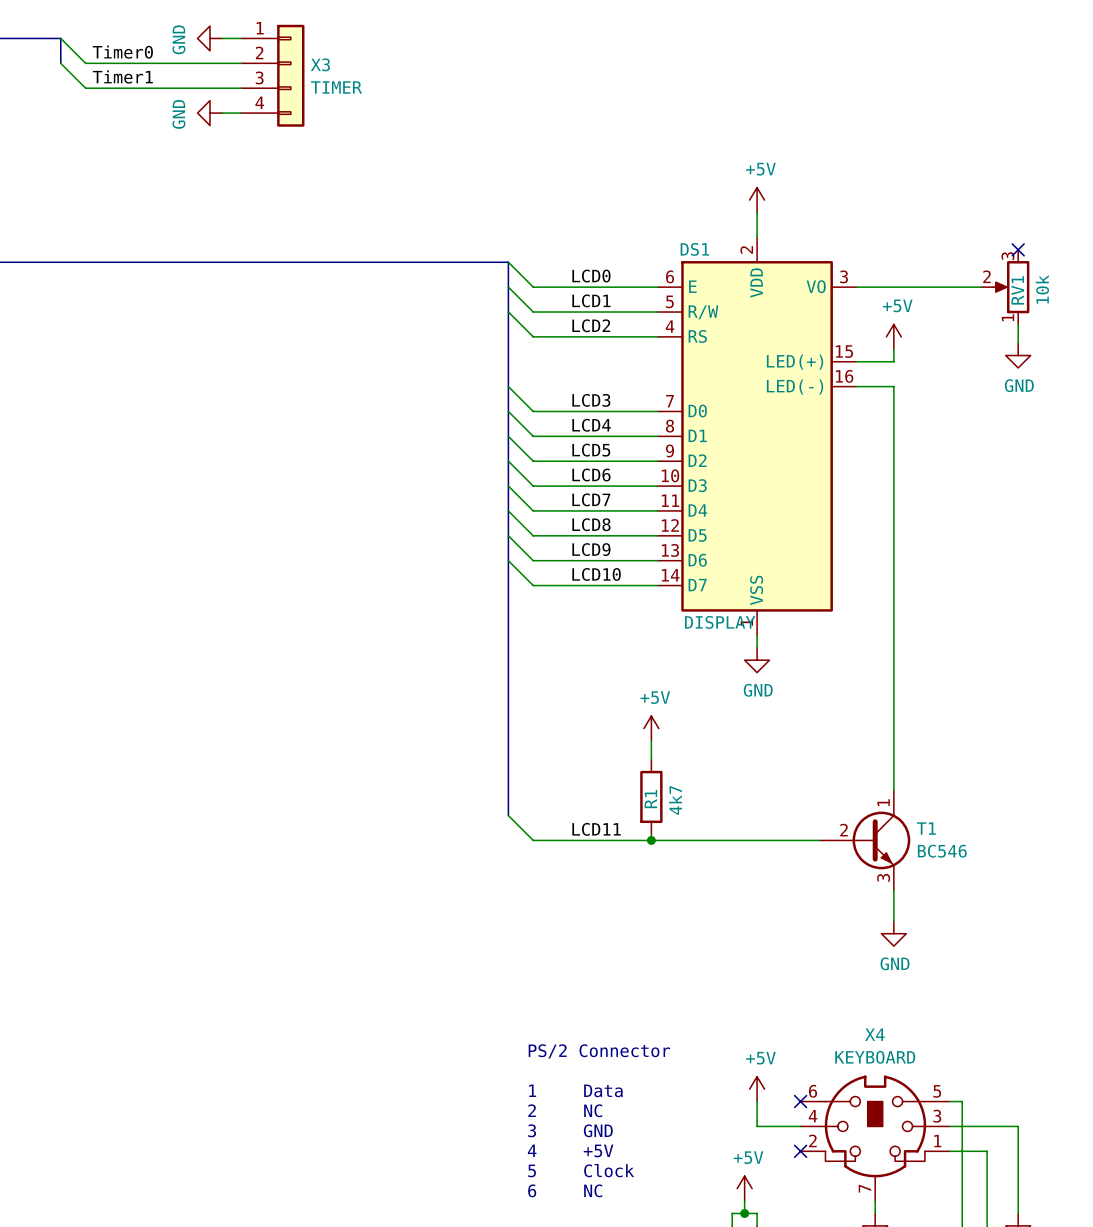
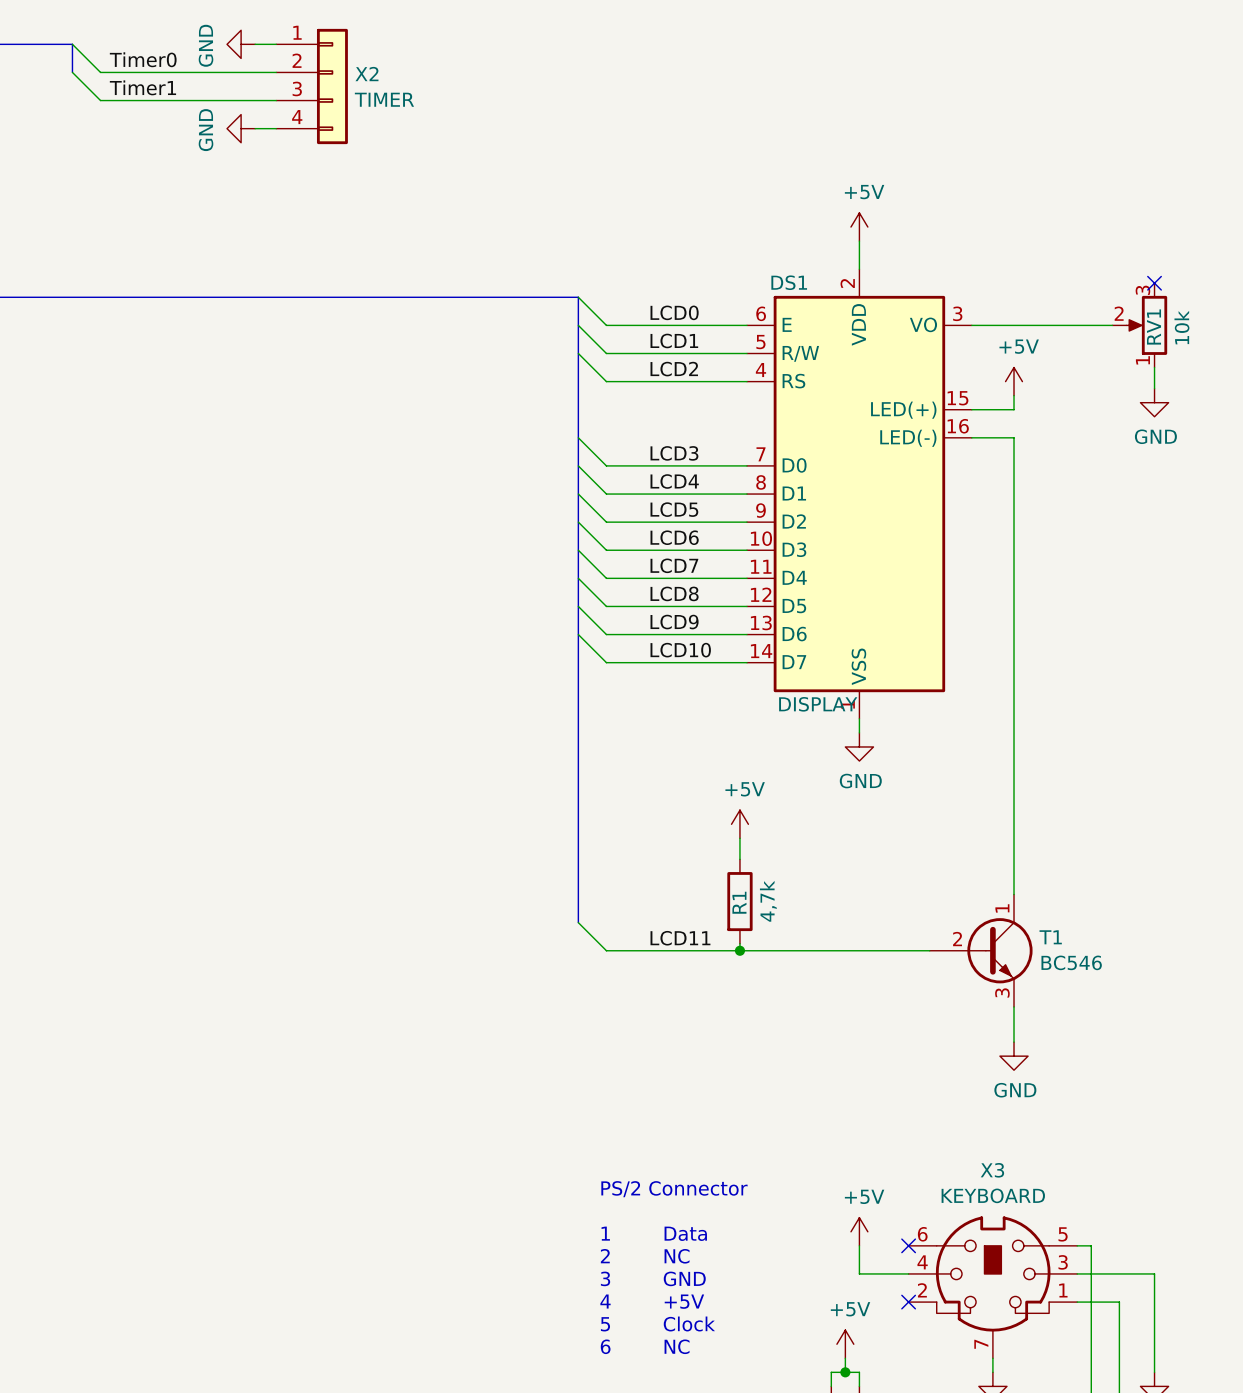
X3 name: X3 (320, 64) -> X2 (366, 74)
R1 value: 4k7 (675, 800) -> 4,7k (768, 901)
X4 name: X4 (874, 1034) -> X3 (992, 1170)

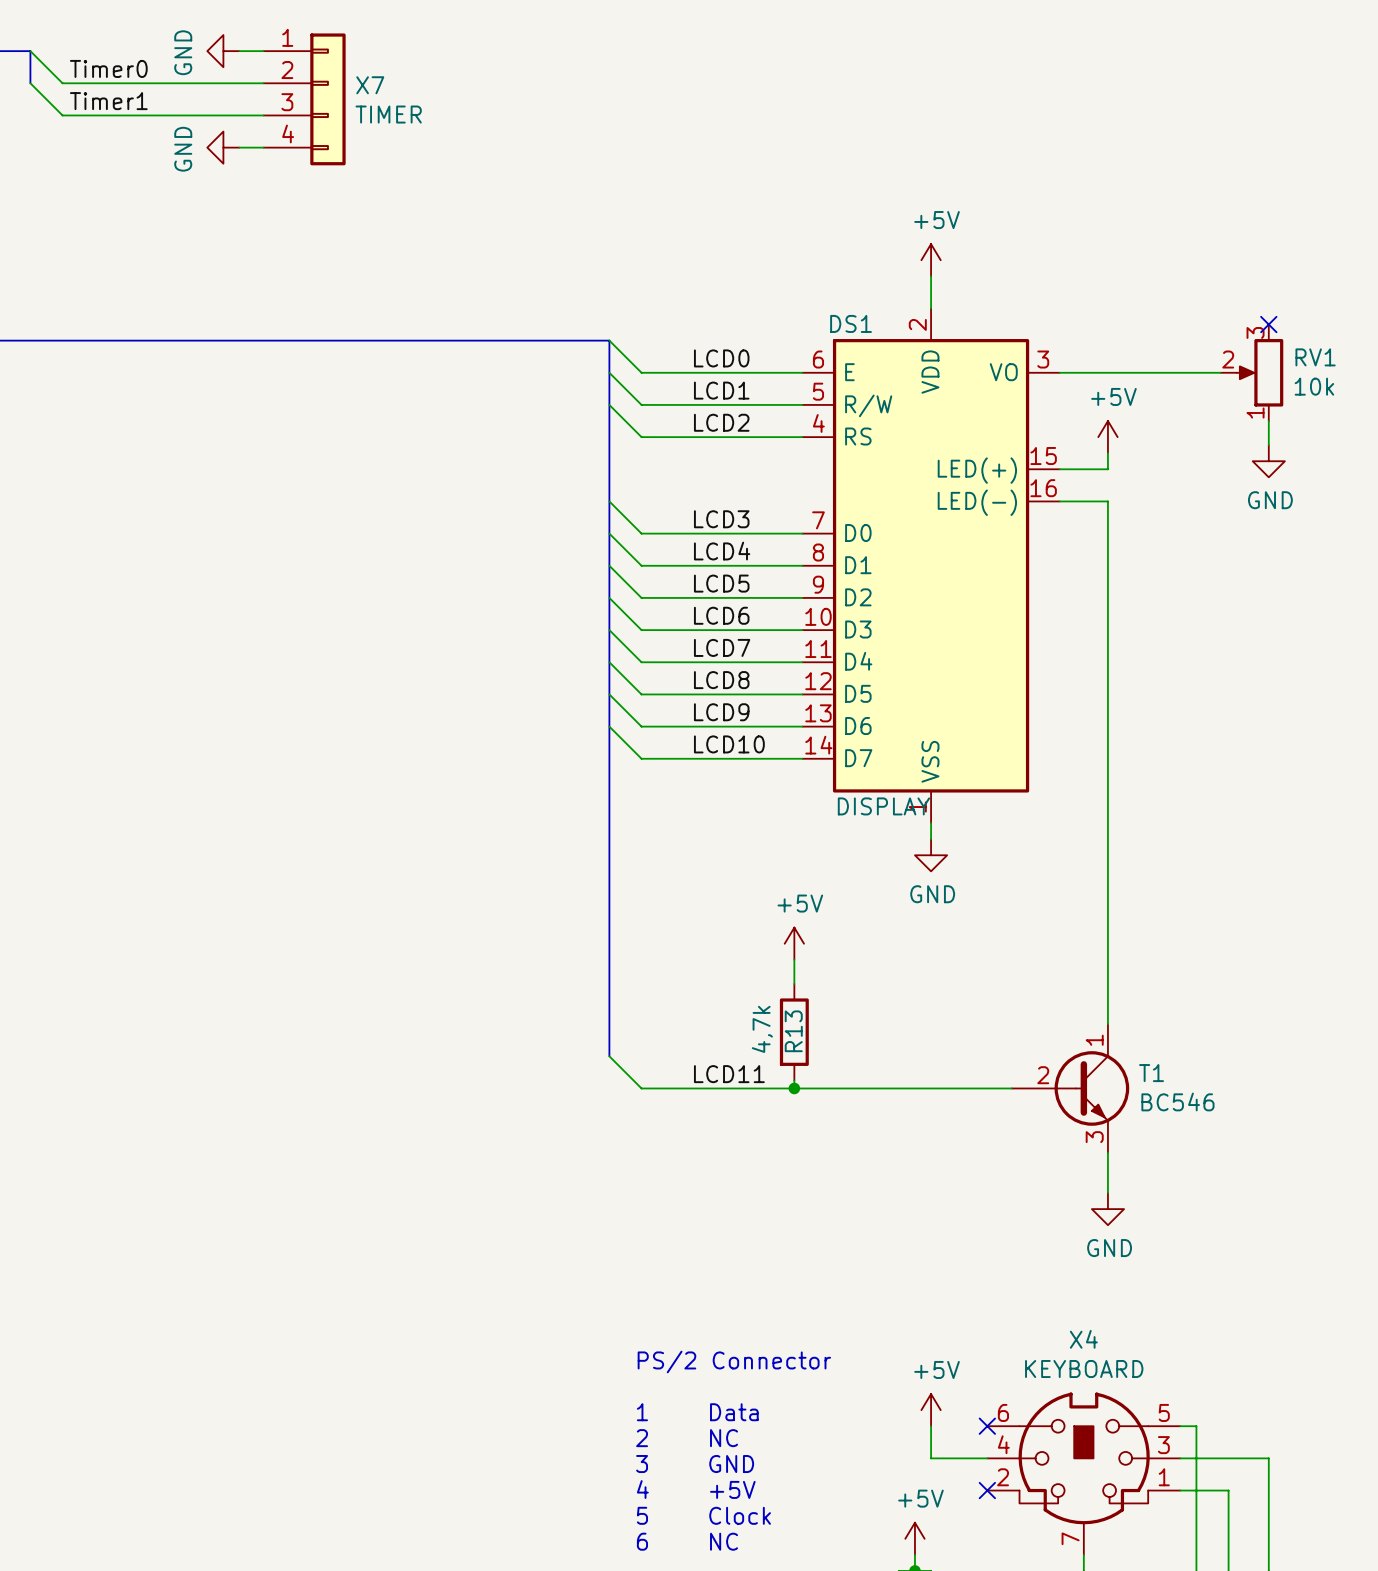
X2 name: X2 (366, 74) -> X7 (370, 85)
RV1 name rotation: 0° (1154, 327) -> 90° clockwise (1315, 357)
RV1 value rotation: 0° (1181, 327) -> 90° clockwise (1314, 386)
R1 value position: 4,7k (768, 901) -> 4,7k (762, 1029)
R1 name: R1 (739, 902) -> R13 (793, 1031)
X3 name: X3 (992, 1170) -> X4 (1083, 1339)

